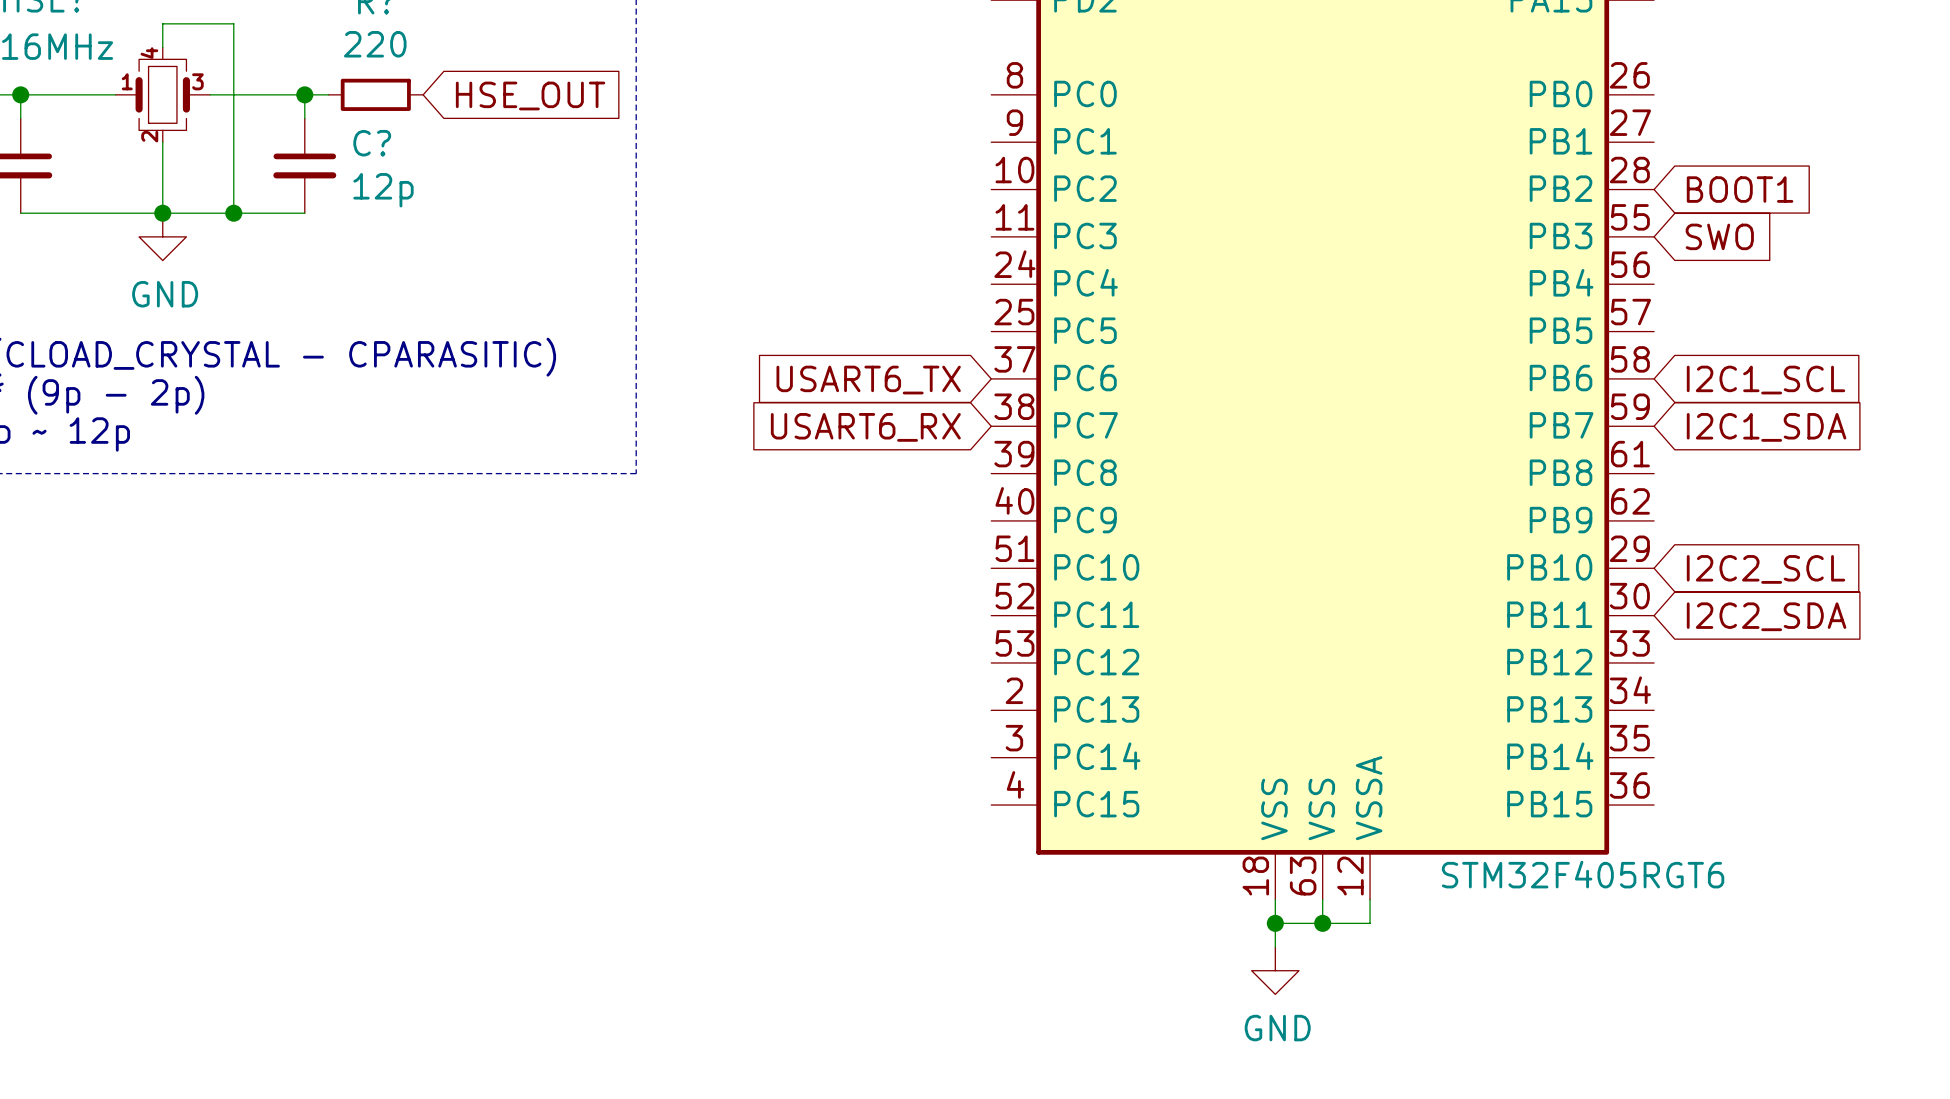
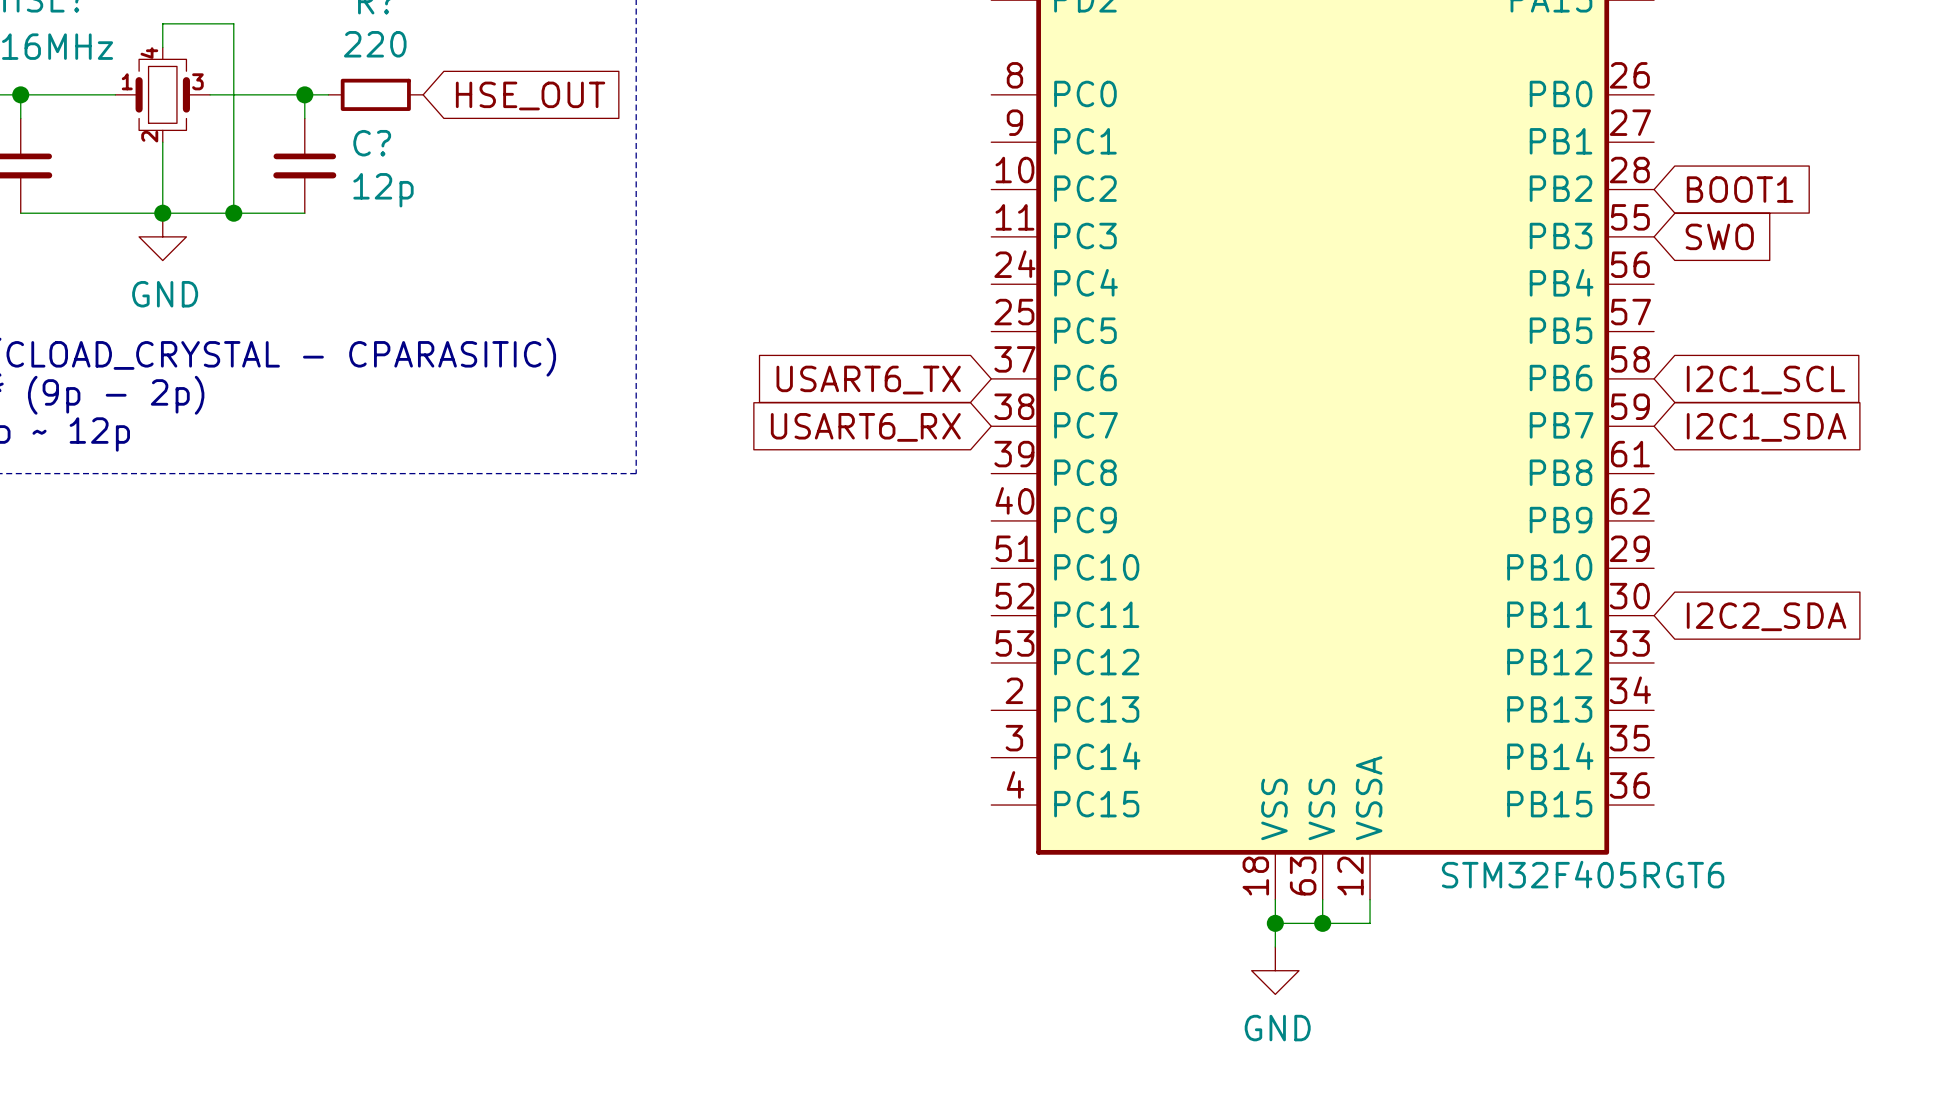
global label: I2C2_SCL (1765, 569) -> none

